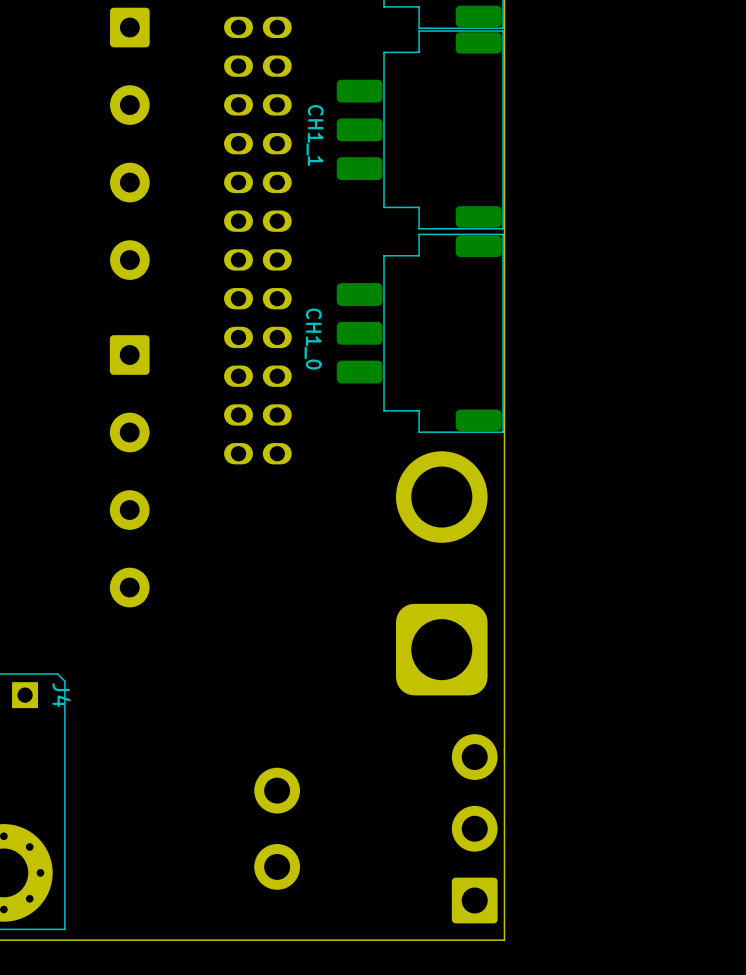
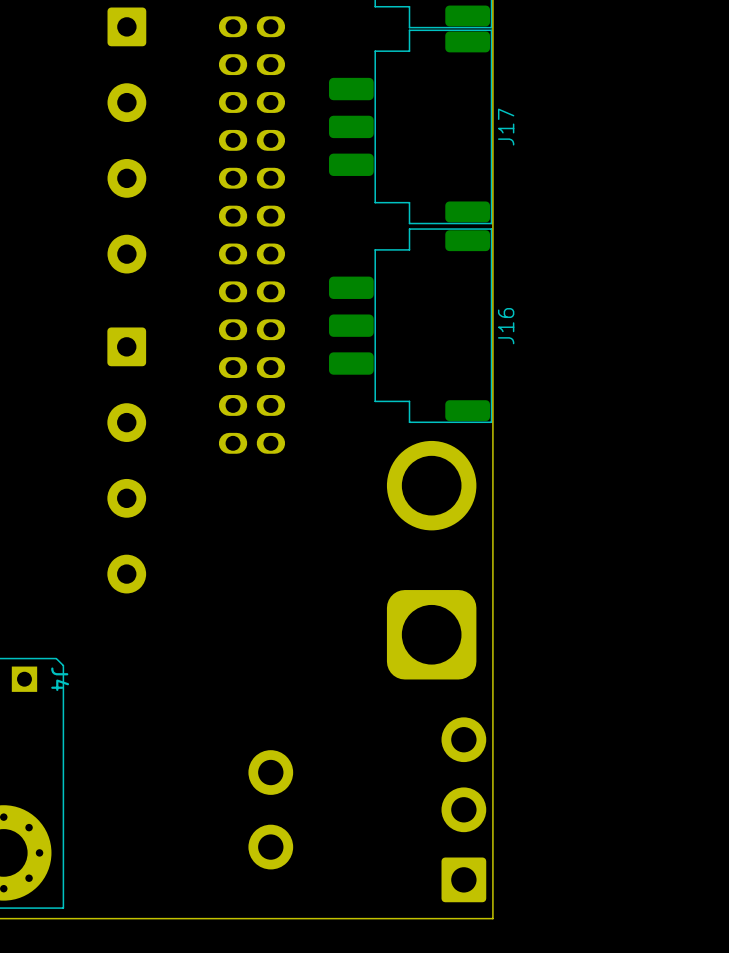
J17 name: none -> J17 (506, 127)
text: CH1_1 (315, 135) -> none
J16 name: none -> J16 (506, 326)
text: CH1_0 (313, 339) -> none

